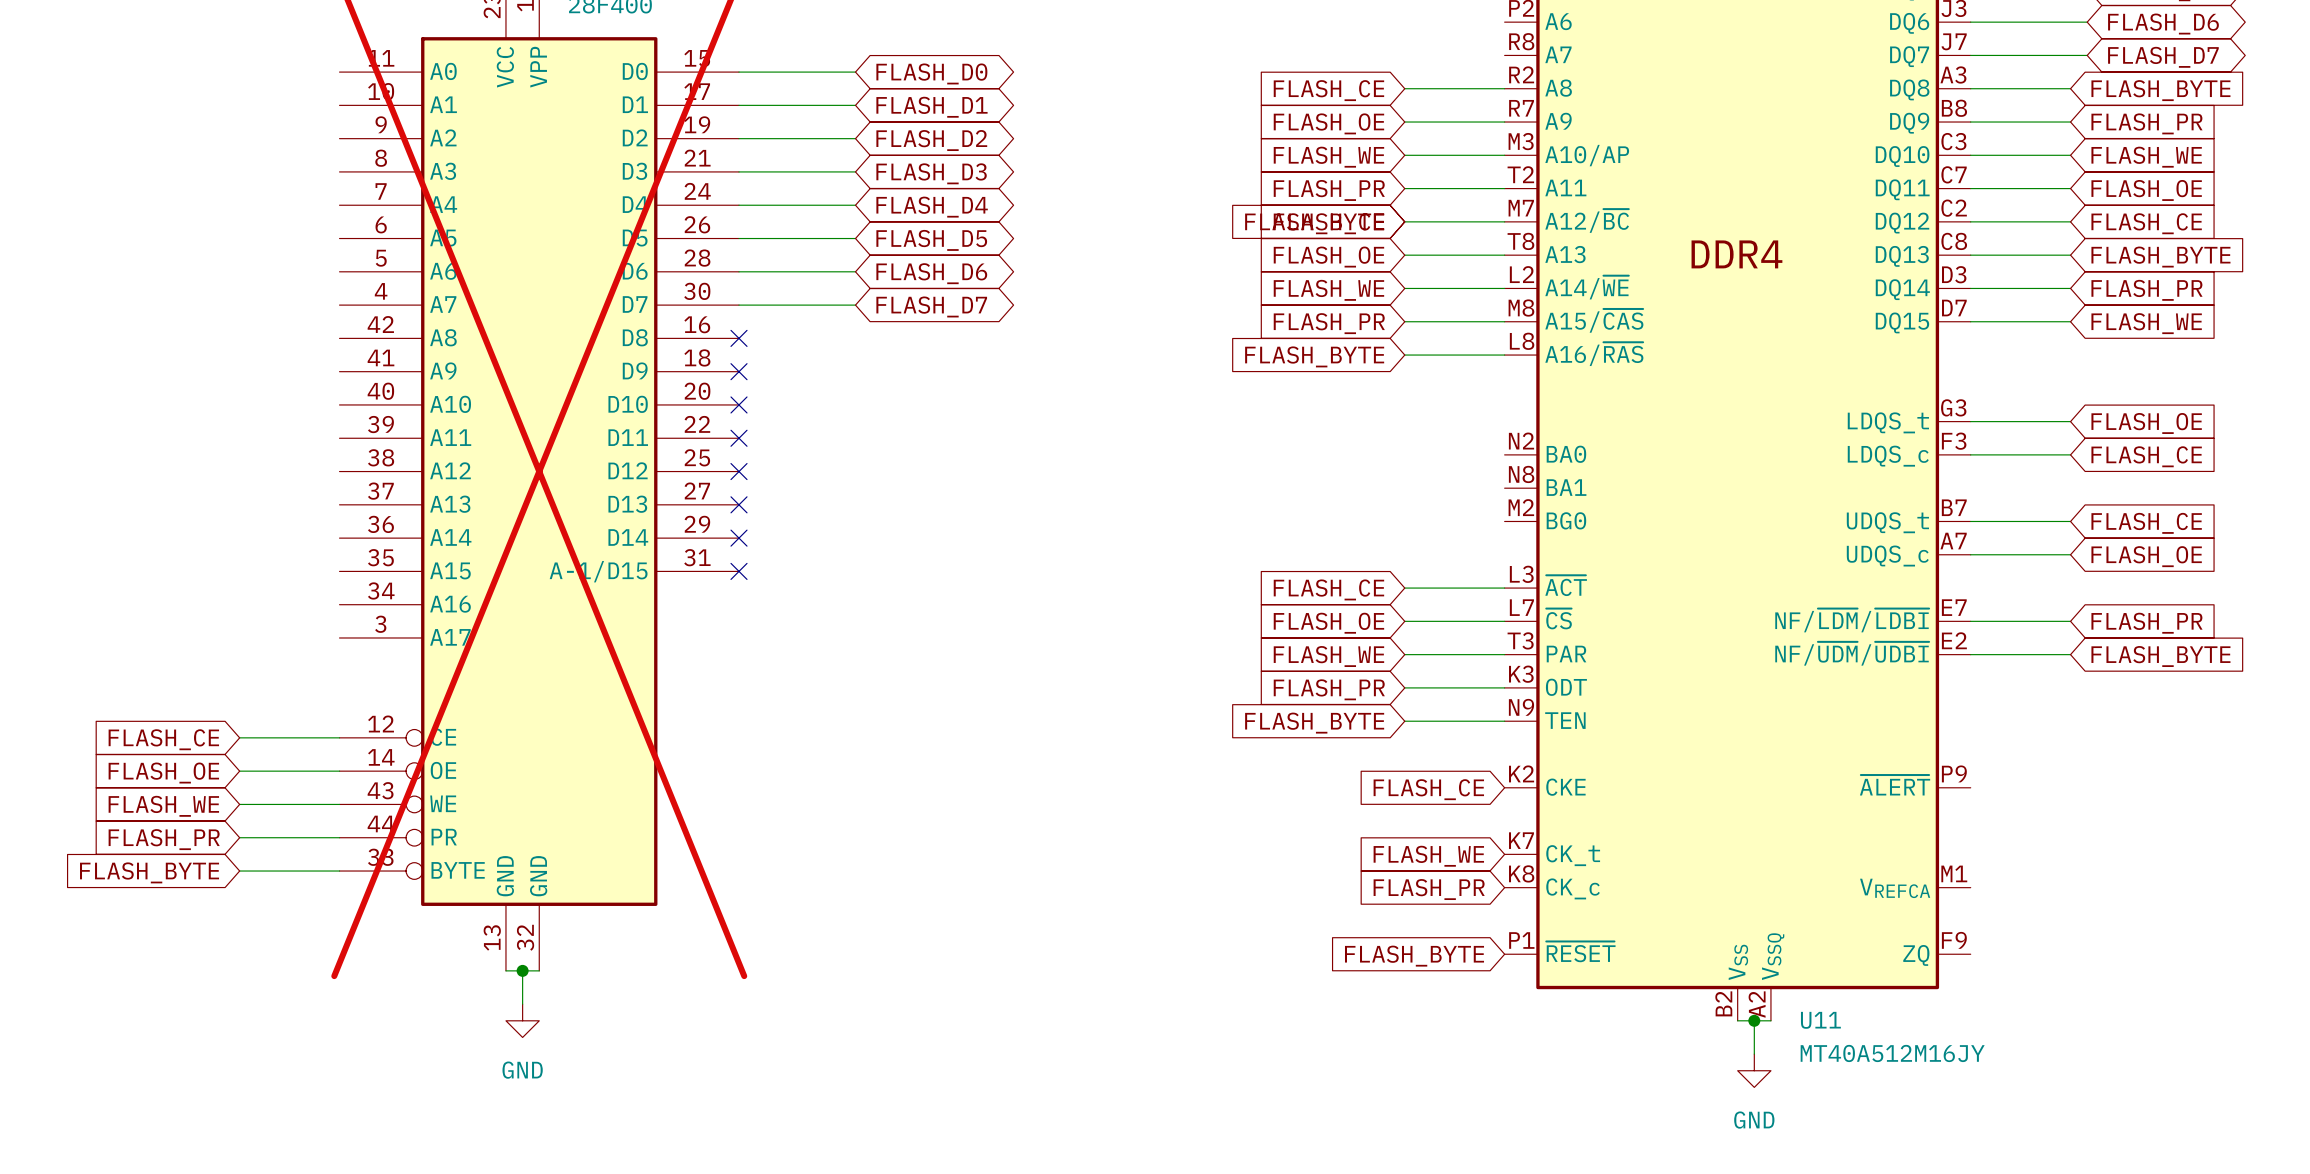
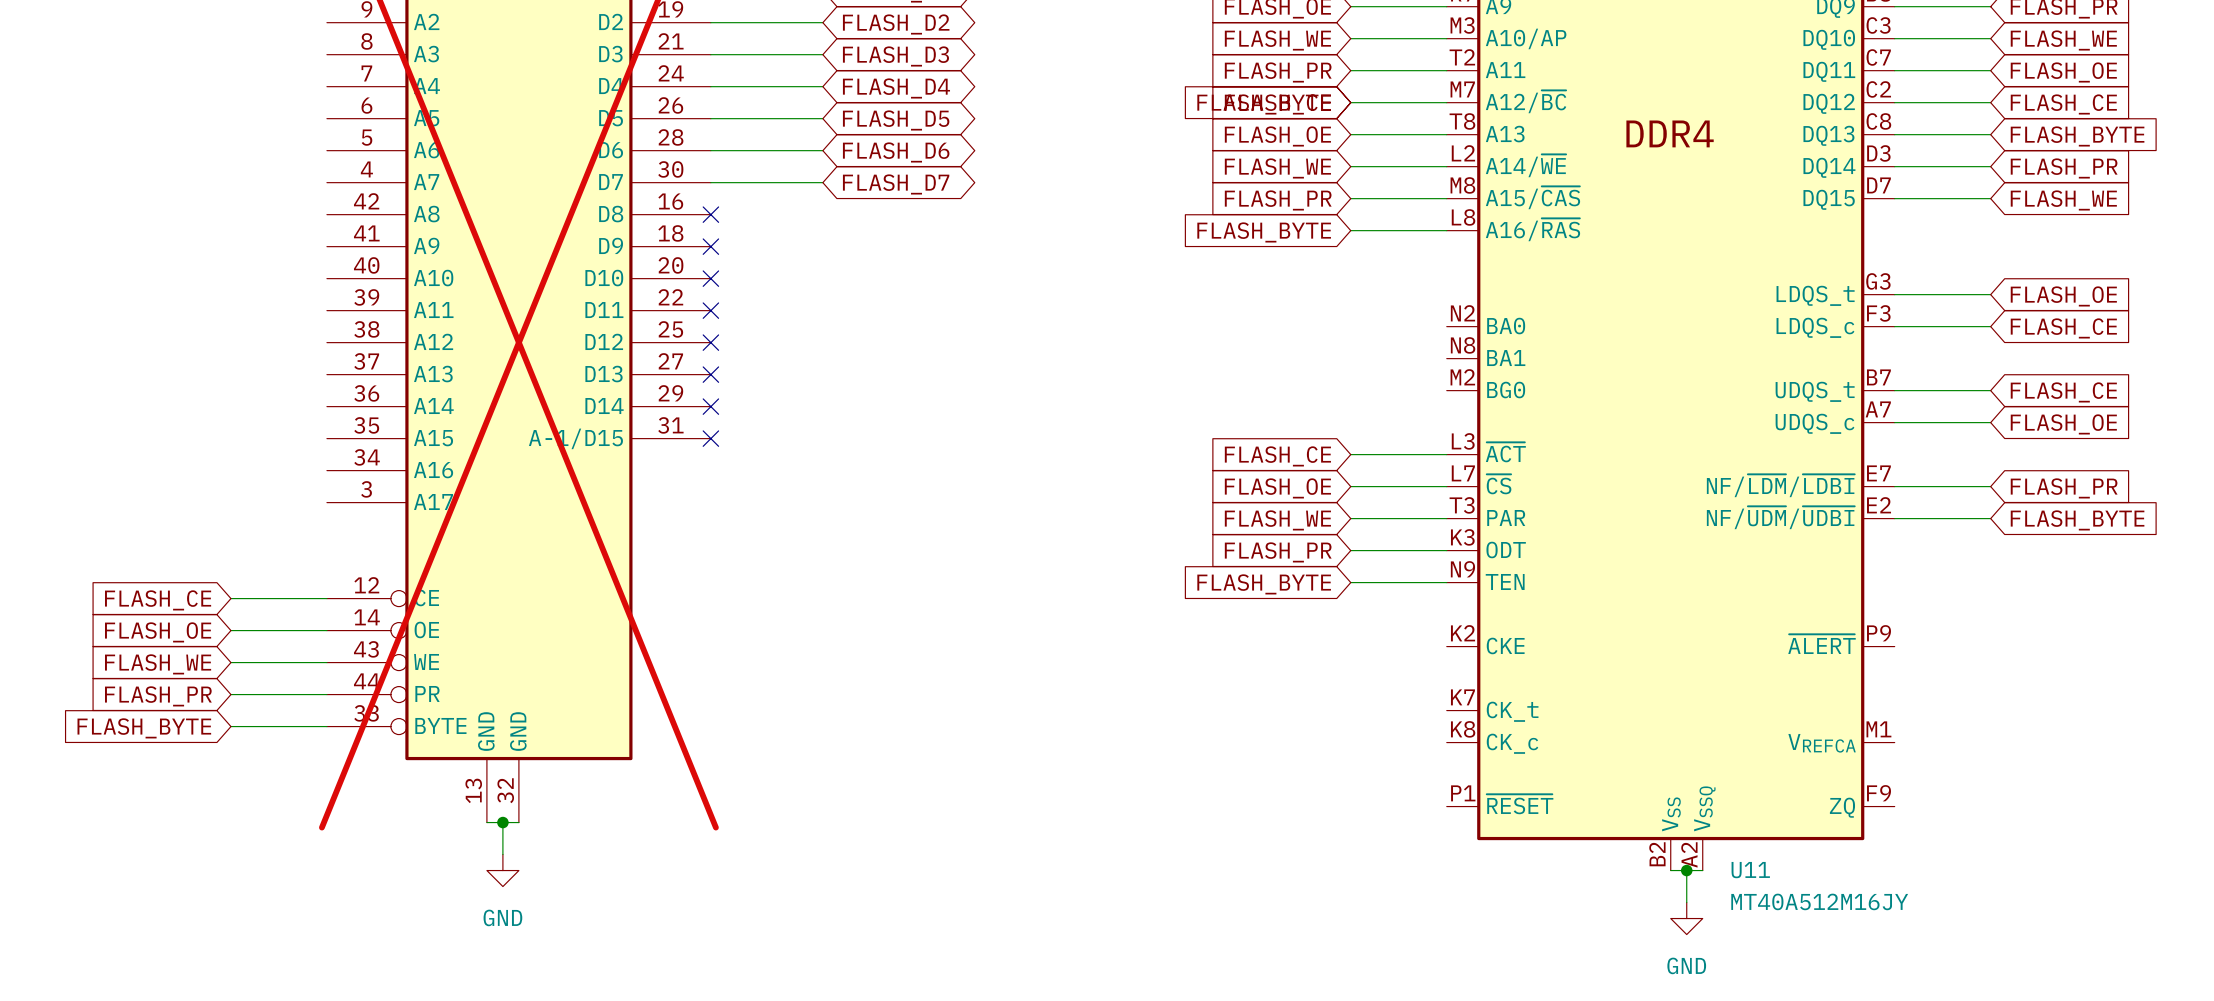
global label: FLASH_CE (1428, 789) -> none
global label: FLASH_WE (1428, 856) -> none
global label: FLASH_PR (1429, 889) -> none
global label: FLASH_BYTE (1414, 956) -> none

